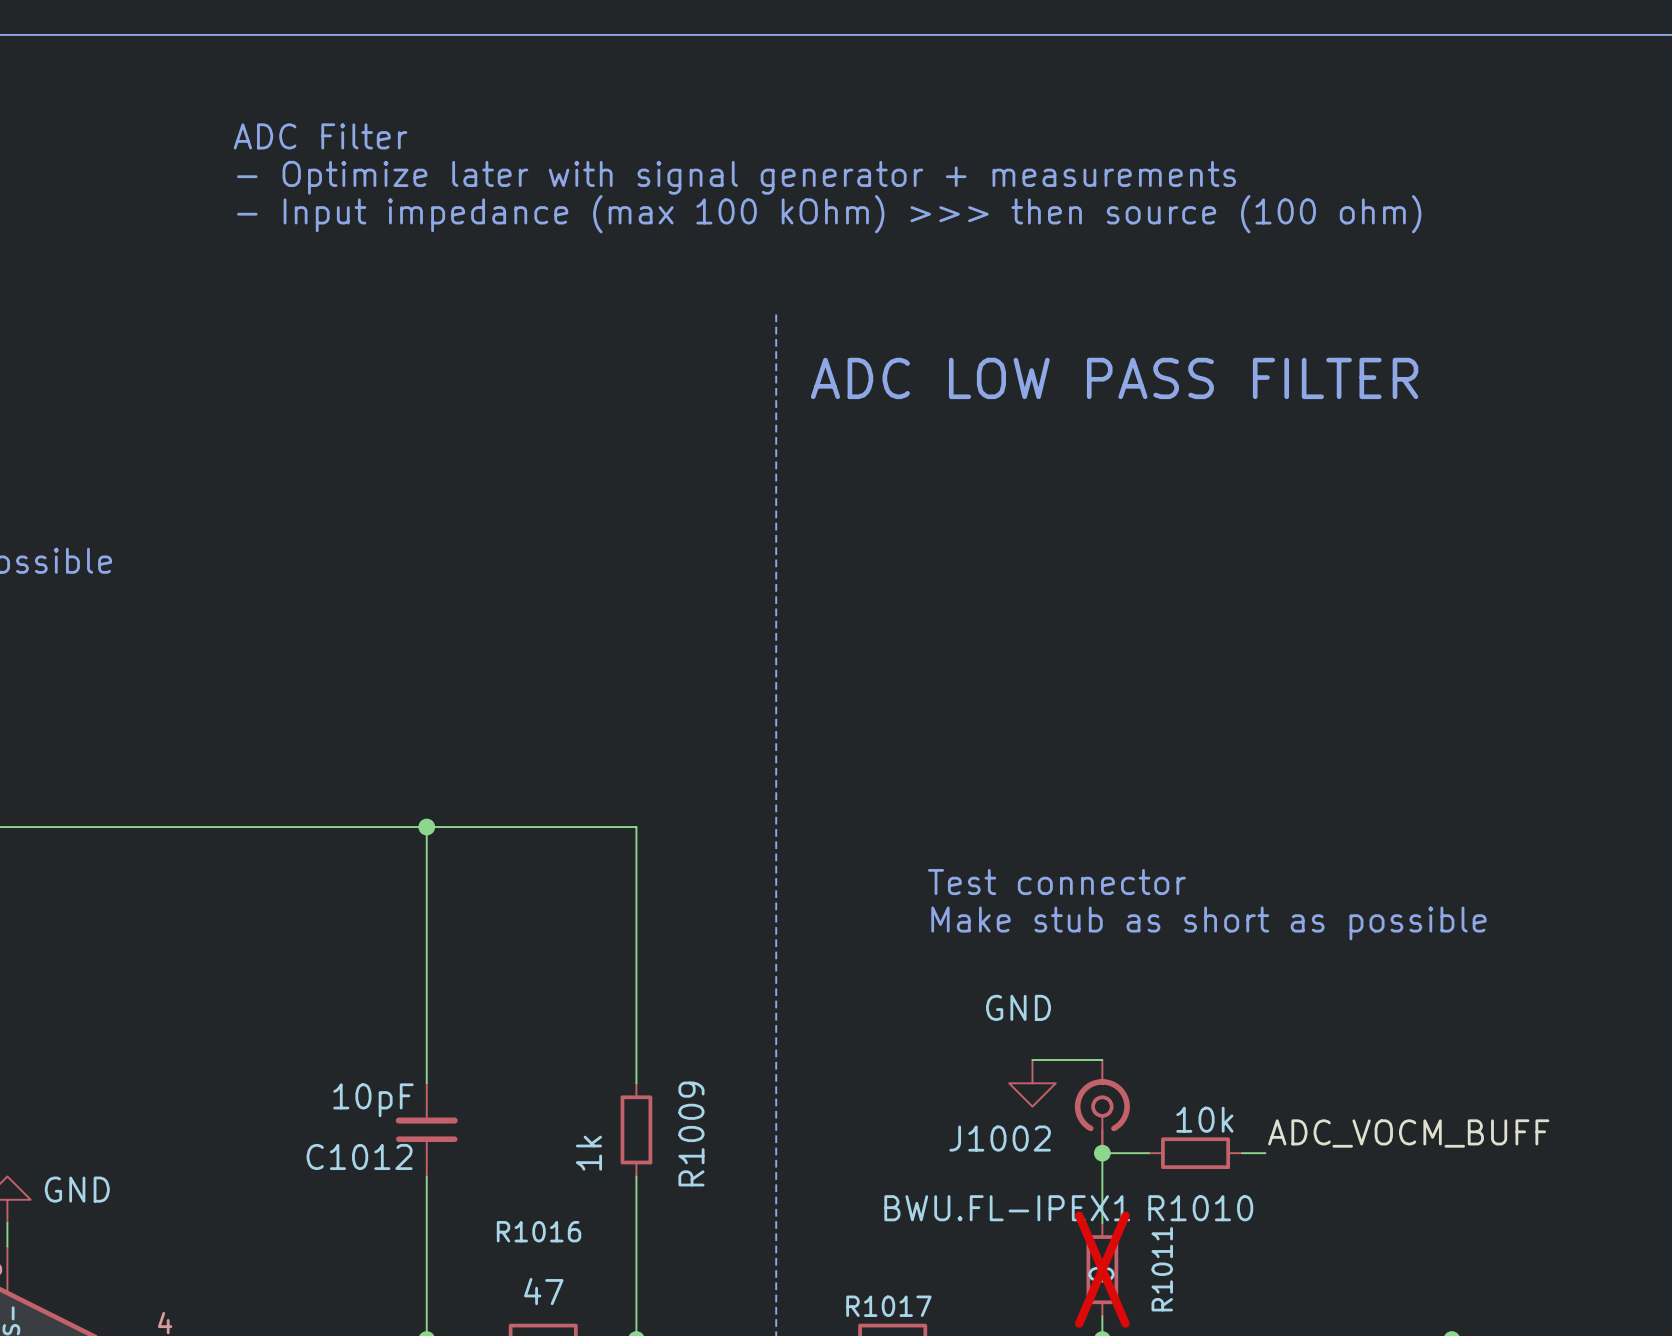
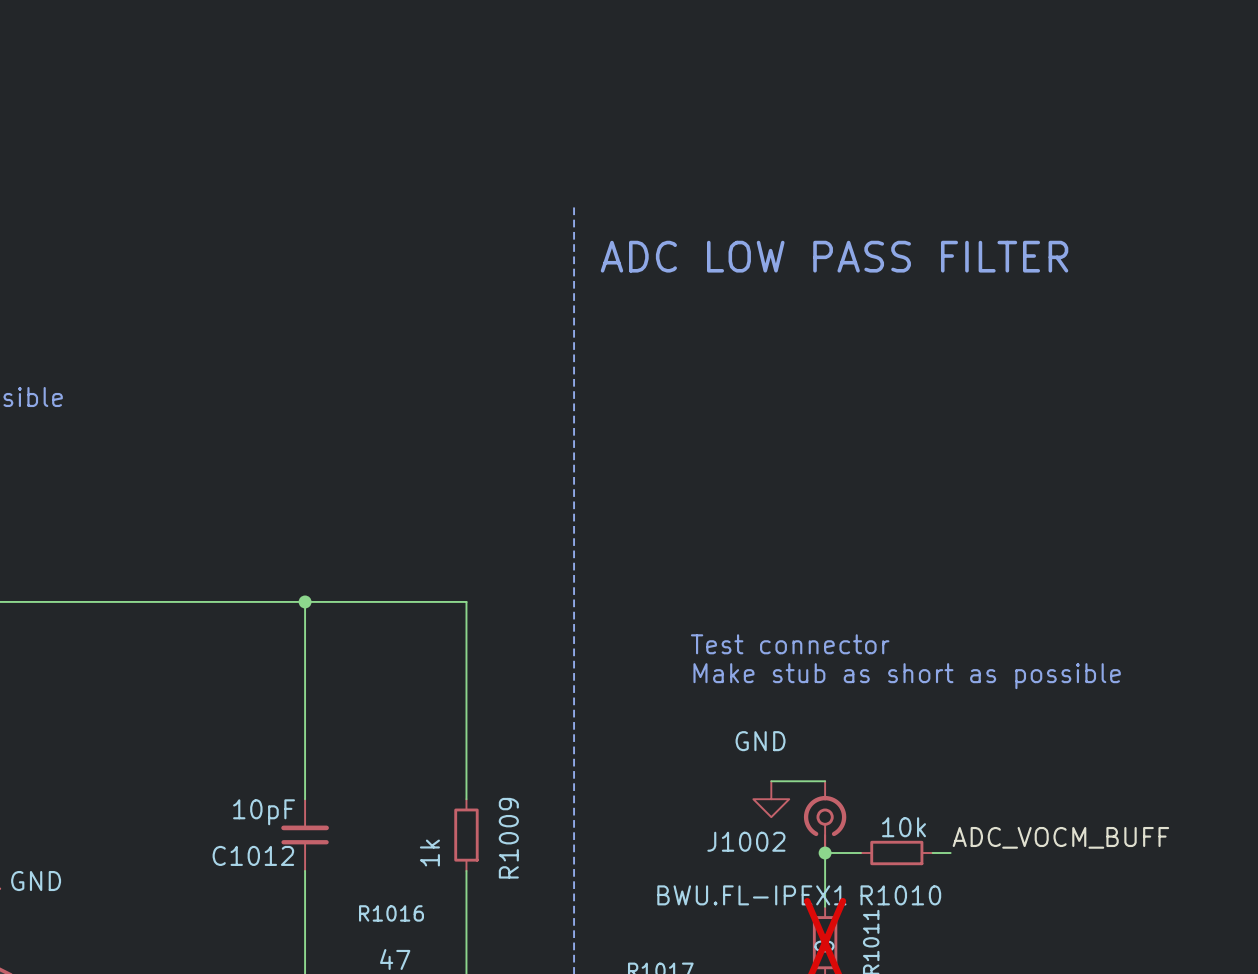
text: ADC Filter (320, 136) -> none
text: - Optimize later with signal generator + measurements (736, 177) -> none
text: - Input impedance (max 100 kOhm) >>> then source (100 ohm) (829, 214) -> none

